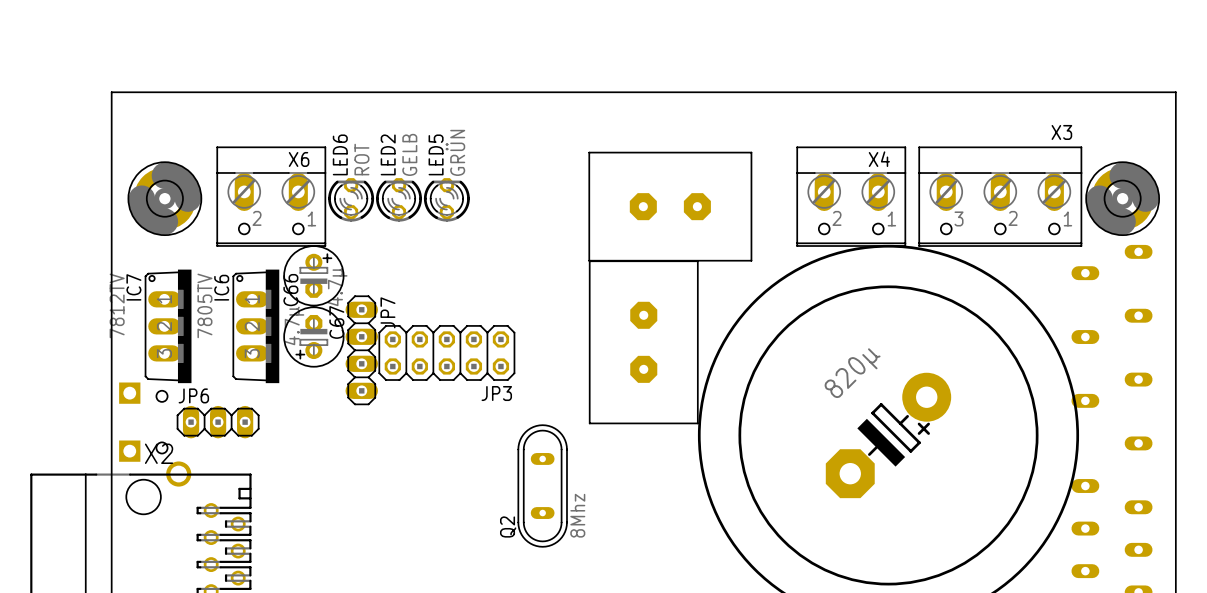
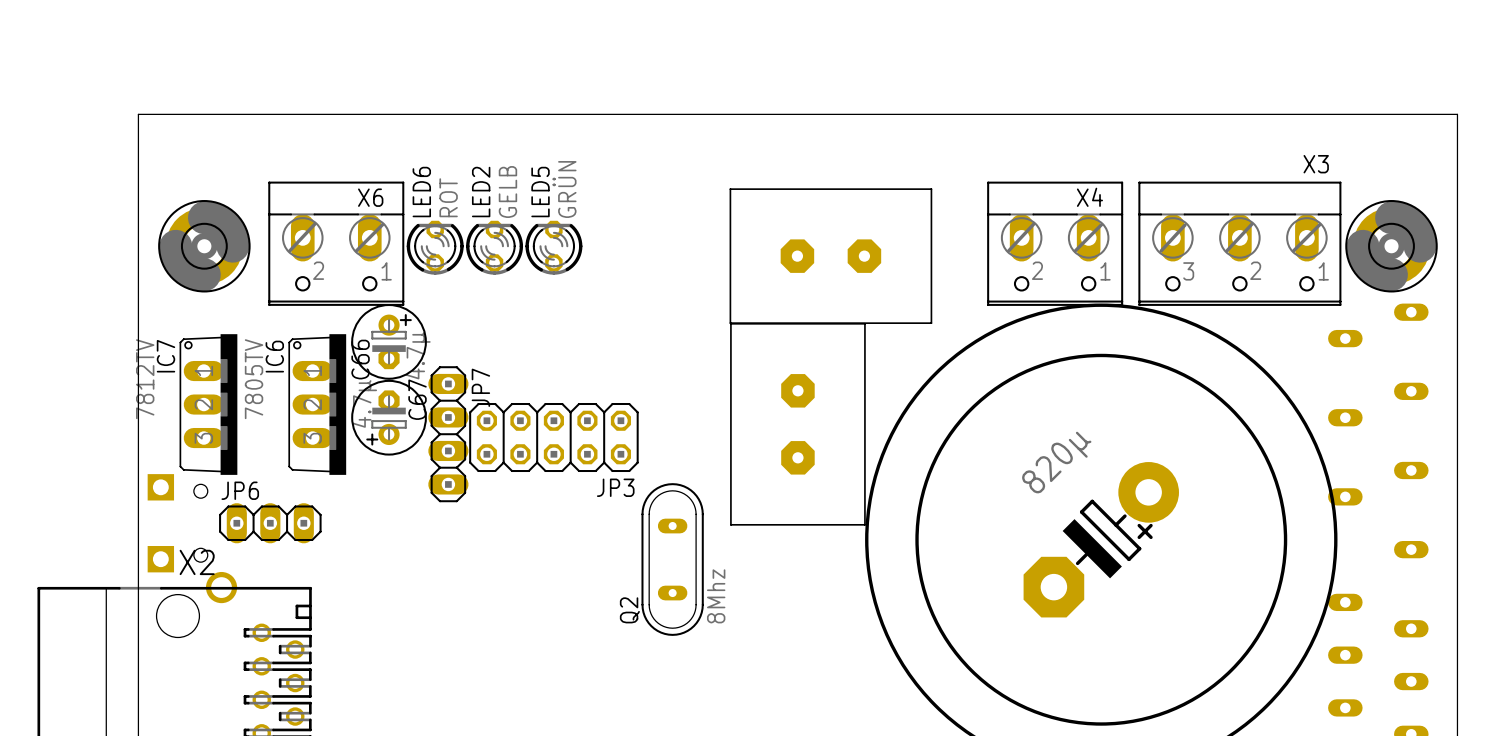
Q2 position: (542, 485) -> (672, 559)

